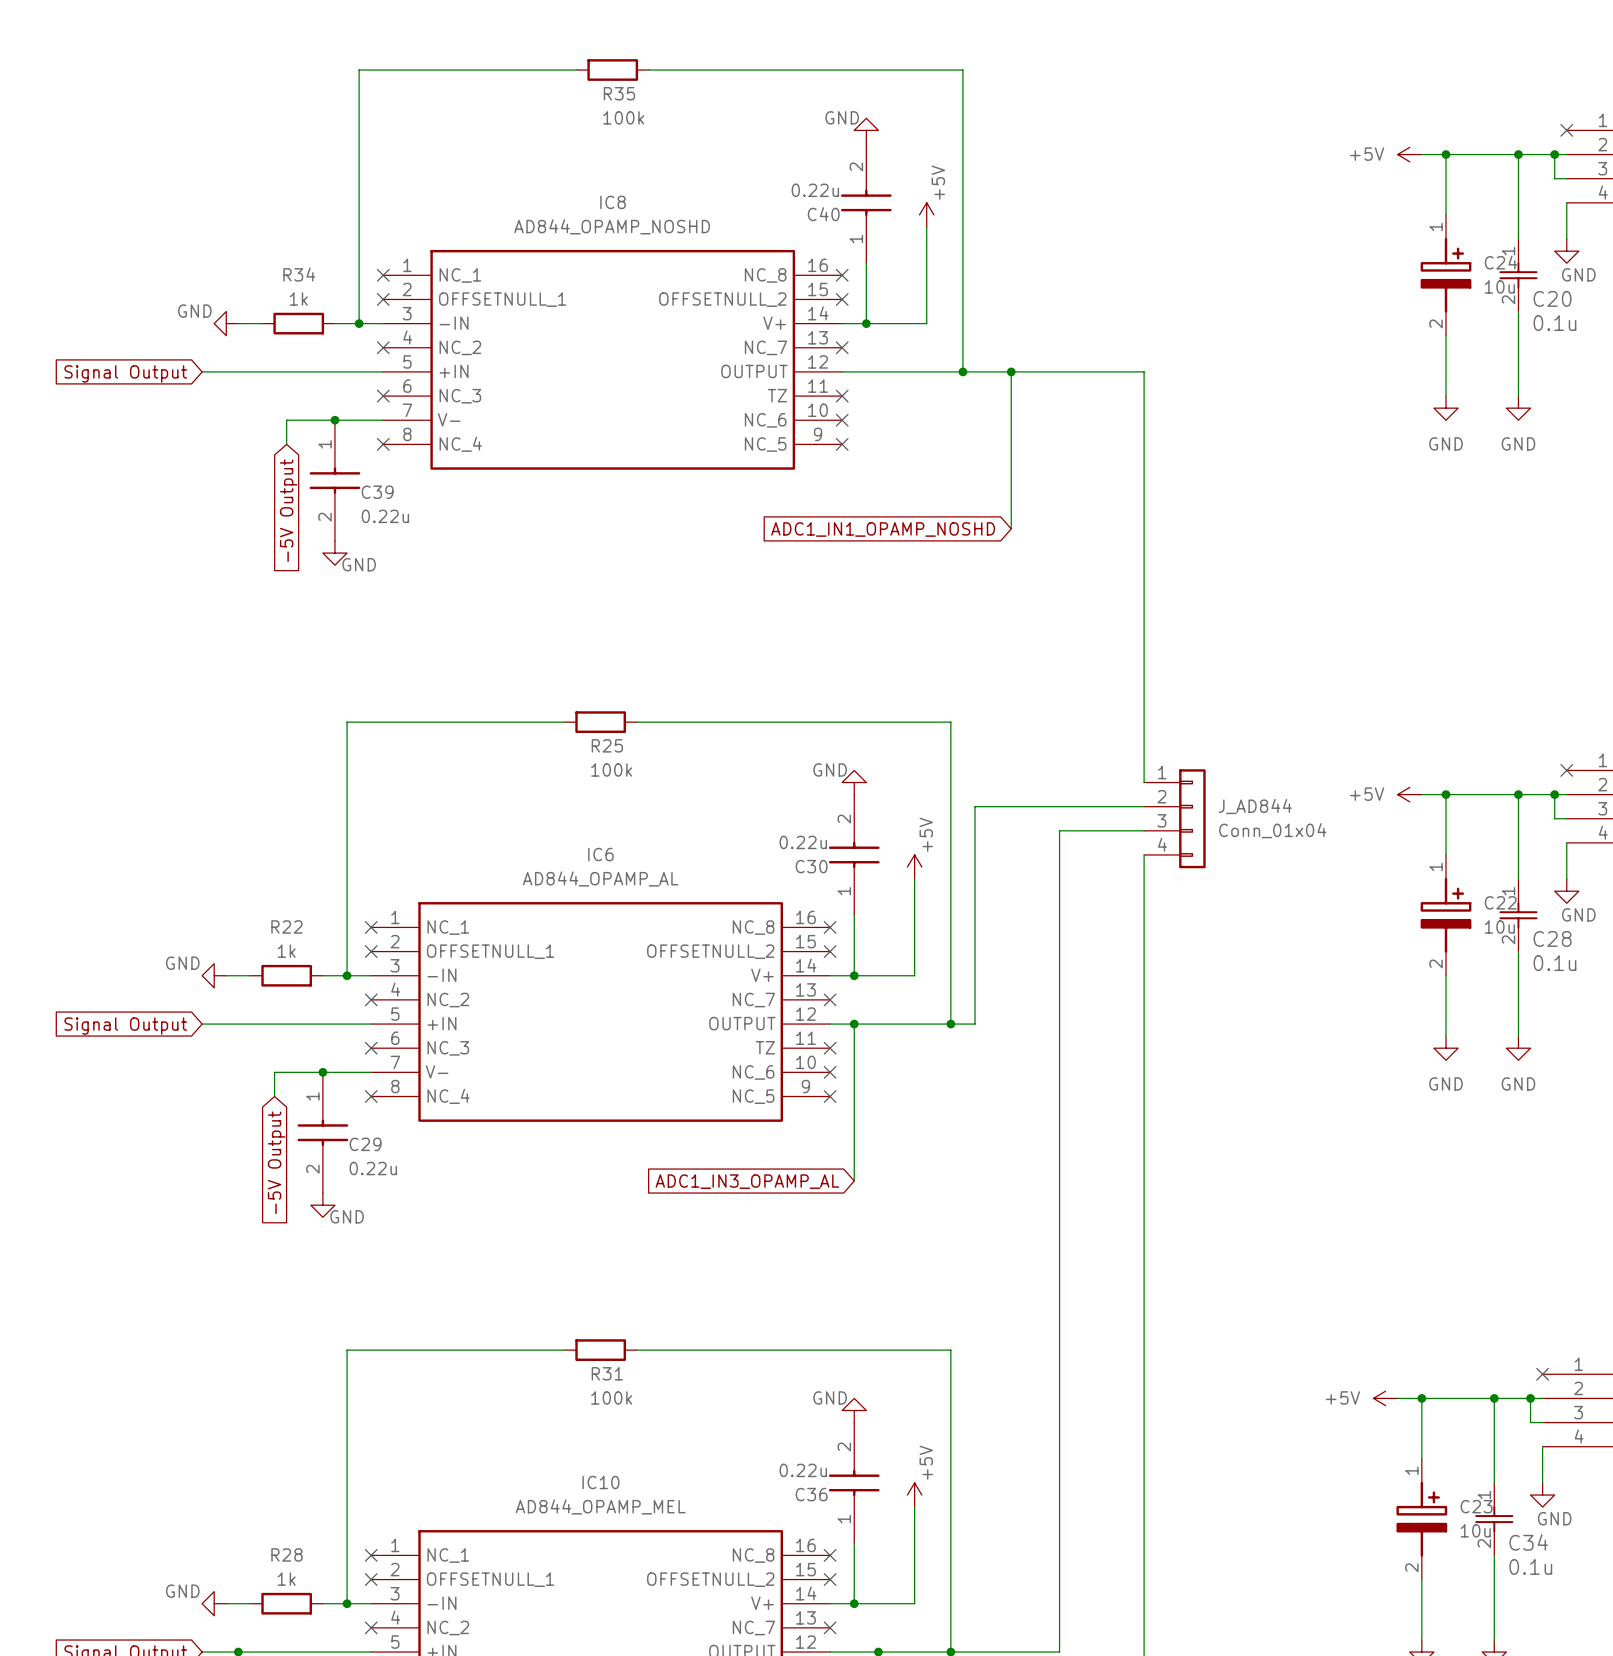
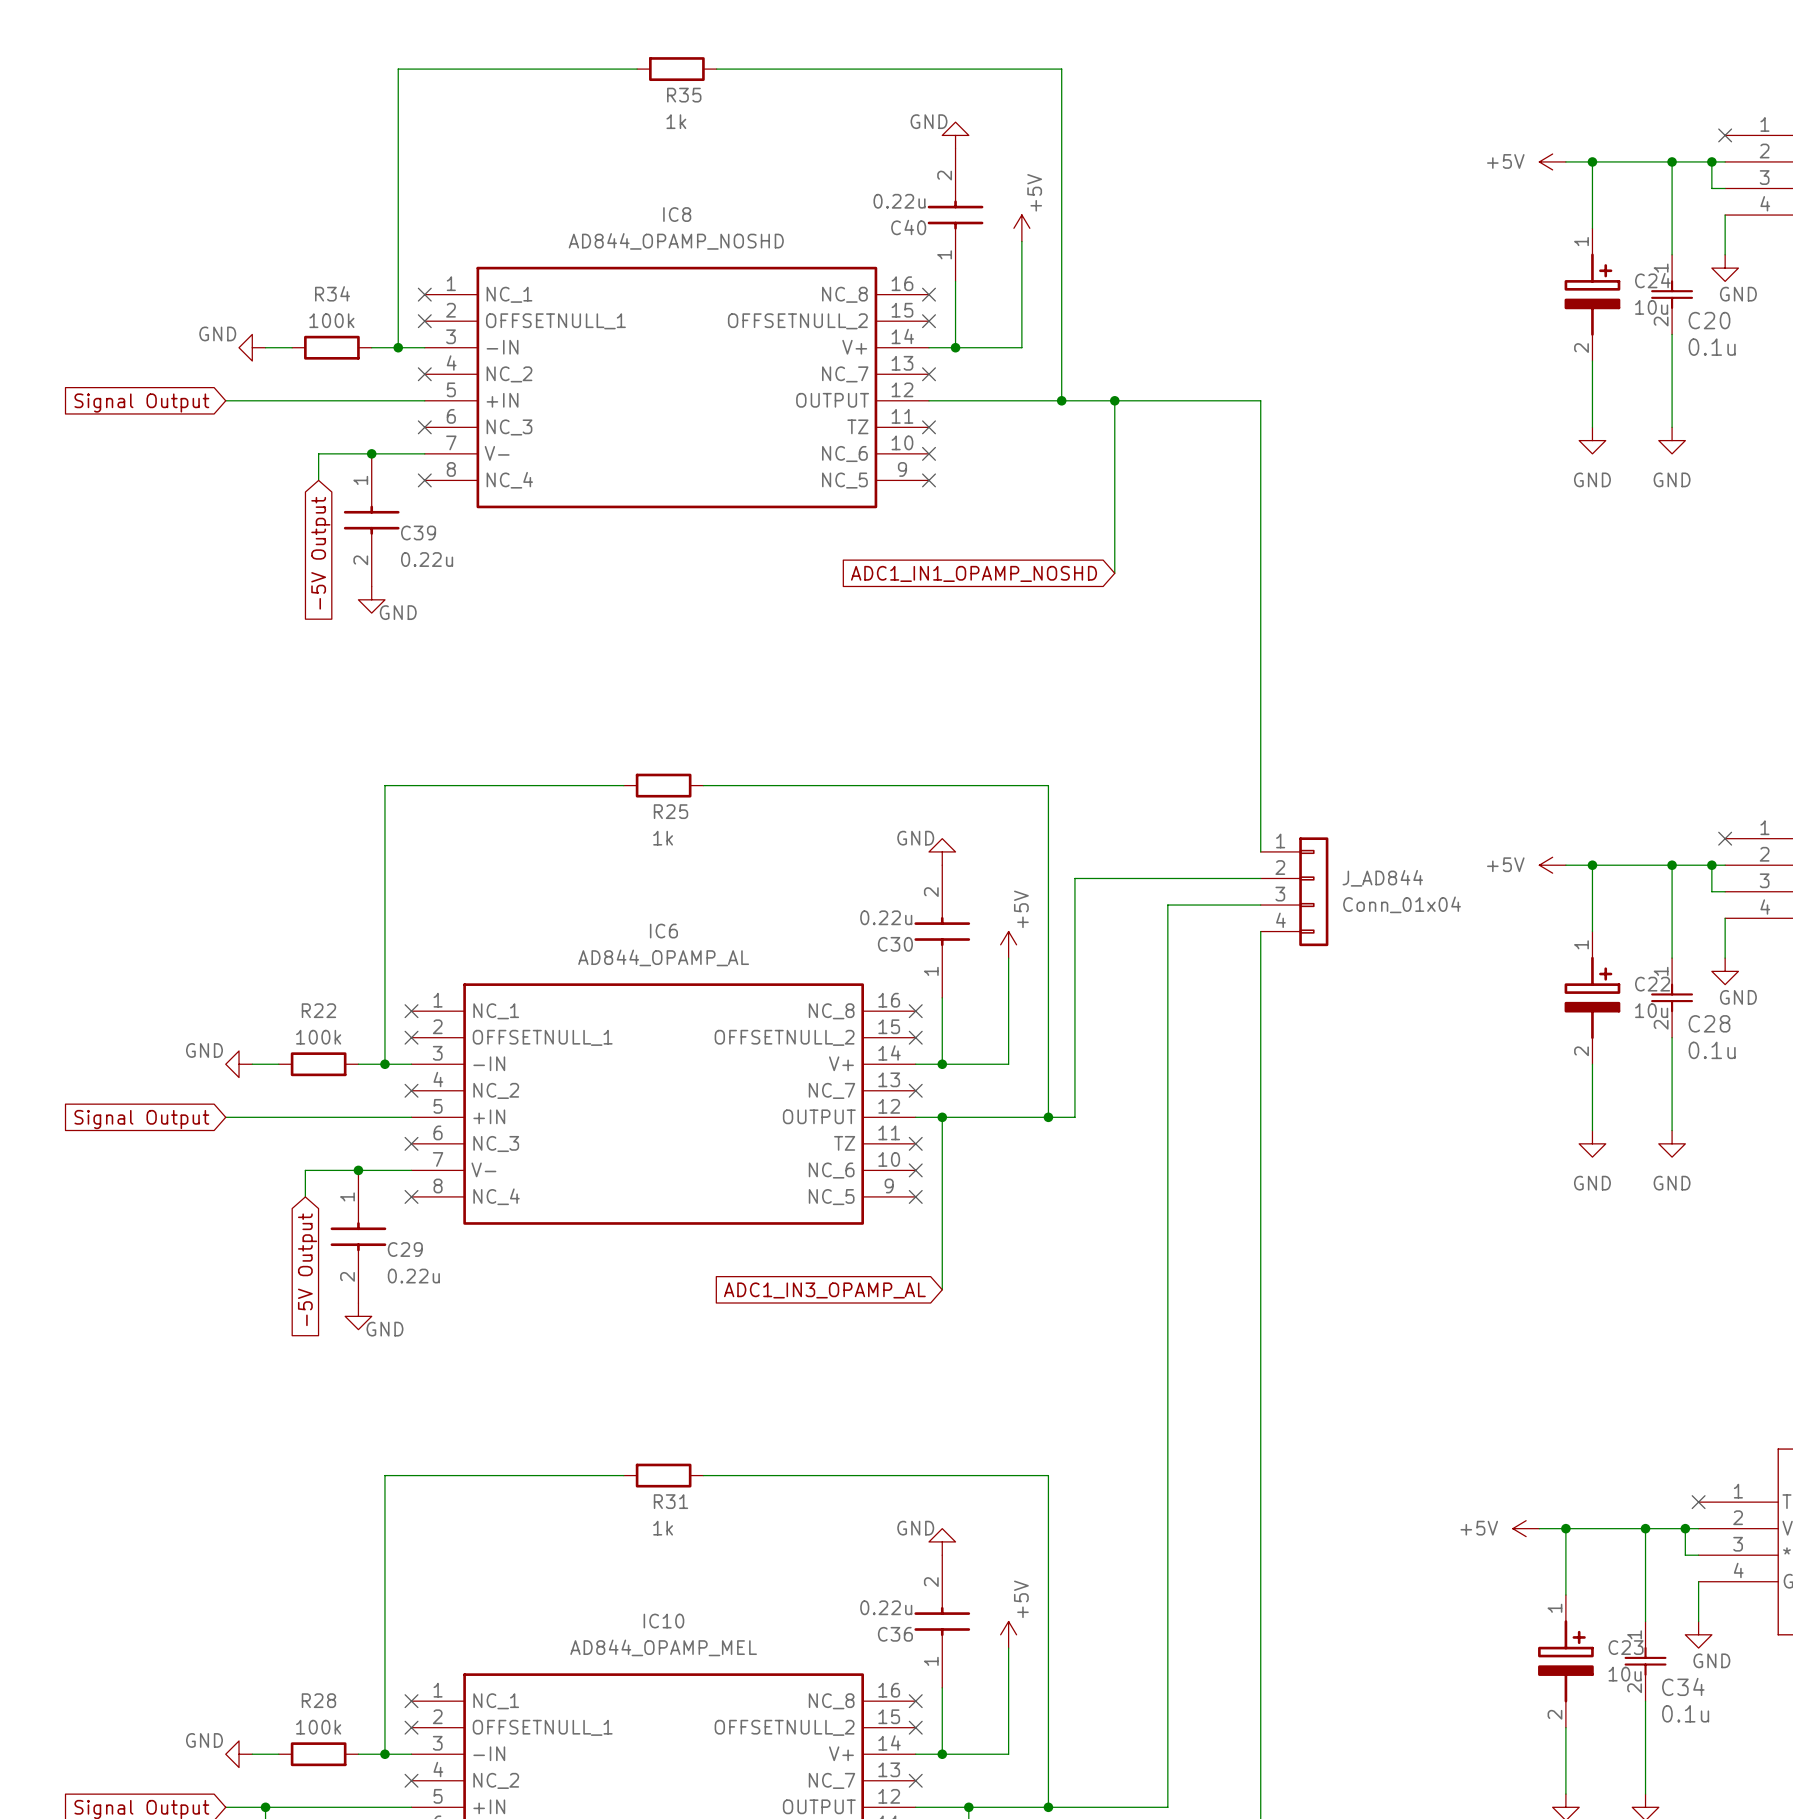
R35 value: 100k (623, 117) -> 1k (676, 121)
R34 value: 1k (298, 299) -> 100k (331, 320)
R25 value: 100k (611, 769) -> 1k (663, 838)
R22 value: 1k (286, 951) -> 100k (318, 1037)
R31 value: 100k (611, 1397) -> 1k (663, 1528)
R28 value: 1k (286, 1579) -> 100k (318, 1727)

